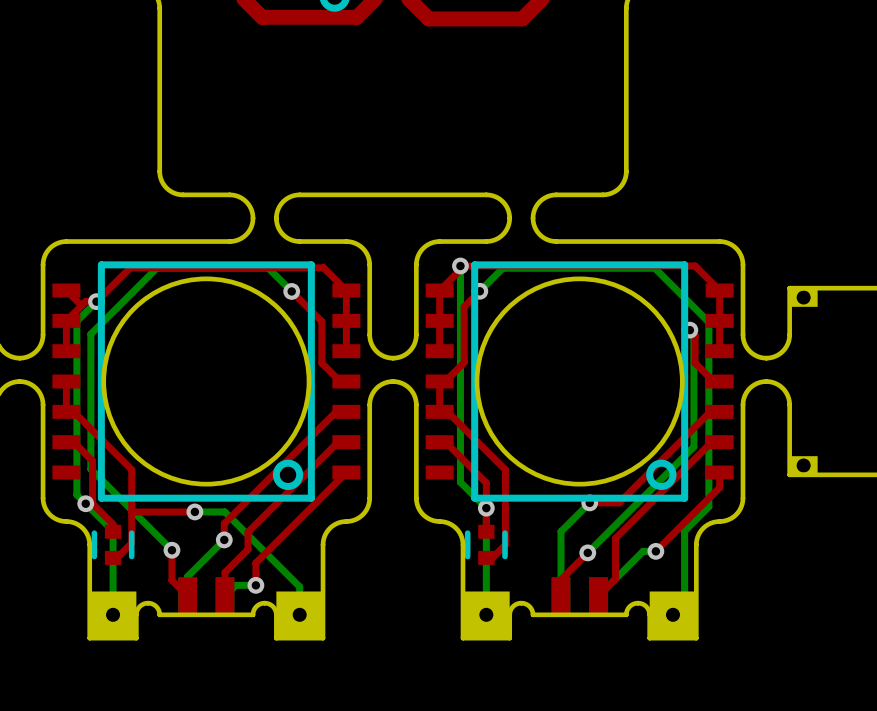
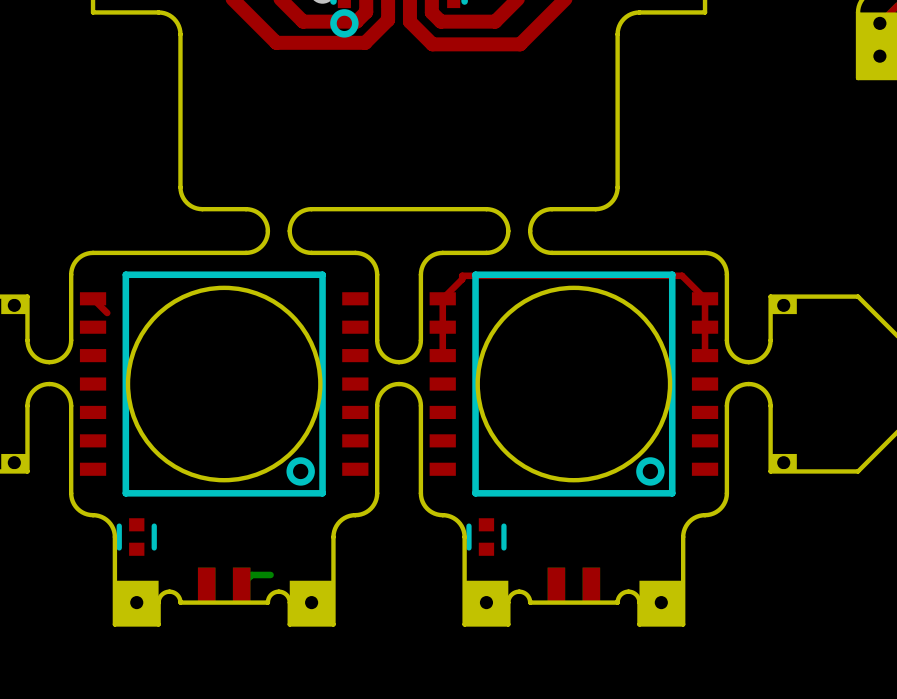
bottom track: (460, 265) (460, 482) (486, 508) (486, 614) -> none
via: (460, 265) -> none
bottom track: (291, 291) (268, 268) (156, 268) (90, 334) (90, 469) (171, 550) -> none
top track: (291, 291) (321, 321) (321, 363) (340, 381) (346, 381) -> none
via: (291, 291) -> none
bottom track: (479, 291) (502, 268) (654, 268) (708, 322) (708, 506) (684, 531) (684, 603) (672, 614) -> none
top track: (479, 291) (464, 306) (464, 362) (445, 381) (439, 381) (439, 411) (447, 411) (505, 469) (505, 544) (492, 557) (486, 557) -> none
via: (479, 291) -> none
bottom track: (96, 301) (76, 321) (76, 494) (113, 531) (113, 614) -> none
via: (96, 301) -> none
bottom track: (689, 330) (693, 334) (693, 446) (587, 552) -> none
top track: (689, 330) (695, 335) (695, 363) (713, 381) (719, 381) -> none
via: (689, 330) -> none
top track: (66, 351) (66, 320) (85, 301) (96, 301) (130, 267) (323, 267) (346, 290) (346, 351) -> none
top track: (66, 381) (66, 411) (73, 411) (131, 469) (131, 543) (116, 557) (113, 557) -> none
top track: (346, 411) (336, 411) (224, 523) (224, 539) -> none
top track: (719, 411) (710, 411) (619, 502) (589, 502) -> none
top track: (66, 442) (73, 442) (92, 461) (92, 503) -> none
top track: (346, 442) (338, 442) (248, 532) (248, 549) (225, 572) (225, 596) -> none
top track: (439, 442) (445, 442) (486, 482) (486, 531) -> none
top track: (719, 442) (711, 442) (615, 538) (615, 578) (598, 596) -> none
top track: (346, 472) (255, 562) (255, 585) -> none
top track: (719, 472) (719, 487) (655, 551) -> none
bottom track: (589, 502) (561, 531) (561, 596) -> none
via: (589, 502) -> none
via: (85, 503) -> none
top track: (92, 503) (113, 524) (113, 531) -> none
via: (486, 508) -> none
top track: (131, 511) (194, 511) -> none
bottom track: (194, 511) (224, 511) (299, 586) (299, 614) -> none
via: (194, 511) -> none
bottom track: (224, 539) (187, 576) (187, 596) -> none
via: (224, 539) -> none
top track: (171, 550) (171, 580) (187, 596) -> none
via: (171, 550) -> none
bottom track: (655, 551) (643, 551) (598, 596) -> none
via: (655, 551) -> none
top track: (587, 552) (561, 579) (561, 596) -> none
via: (587, 552) -> none
via: (255, 585) -> none

